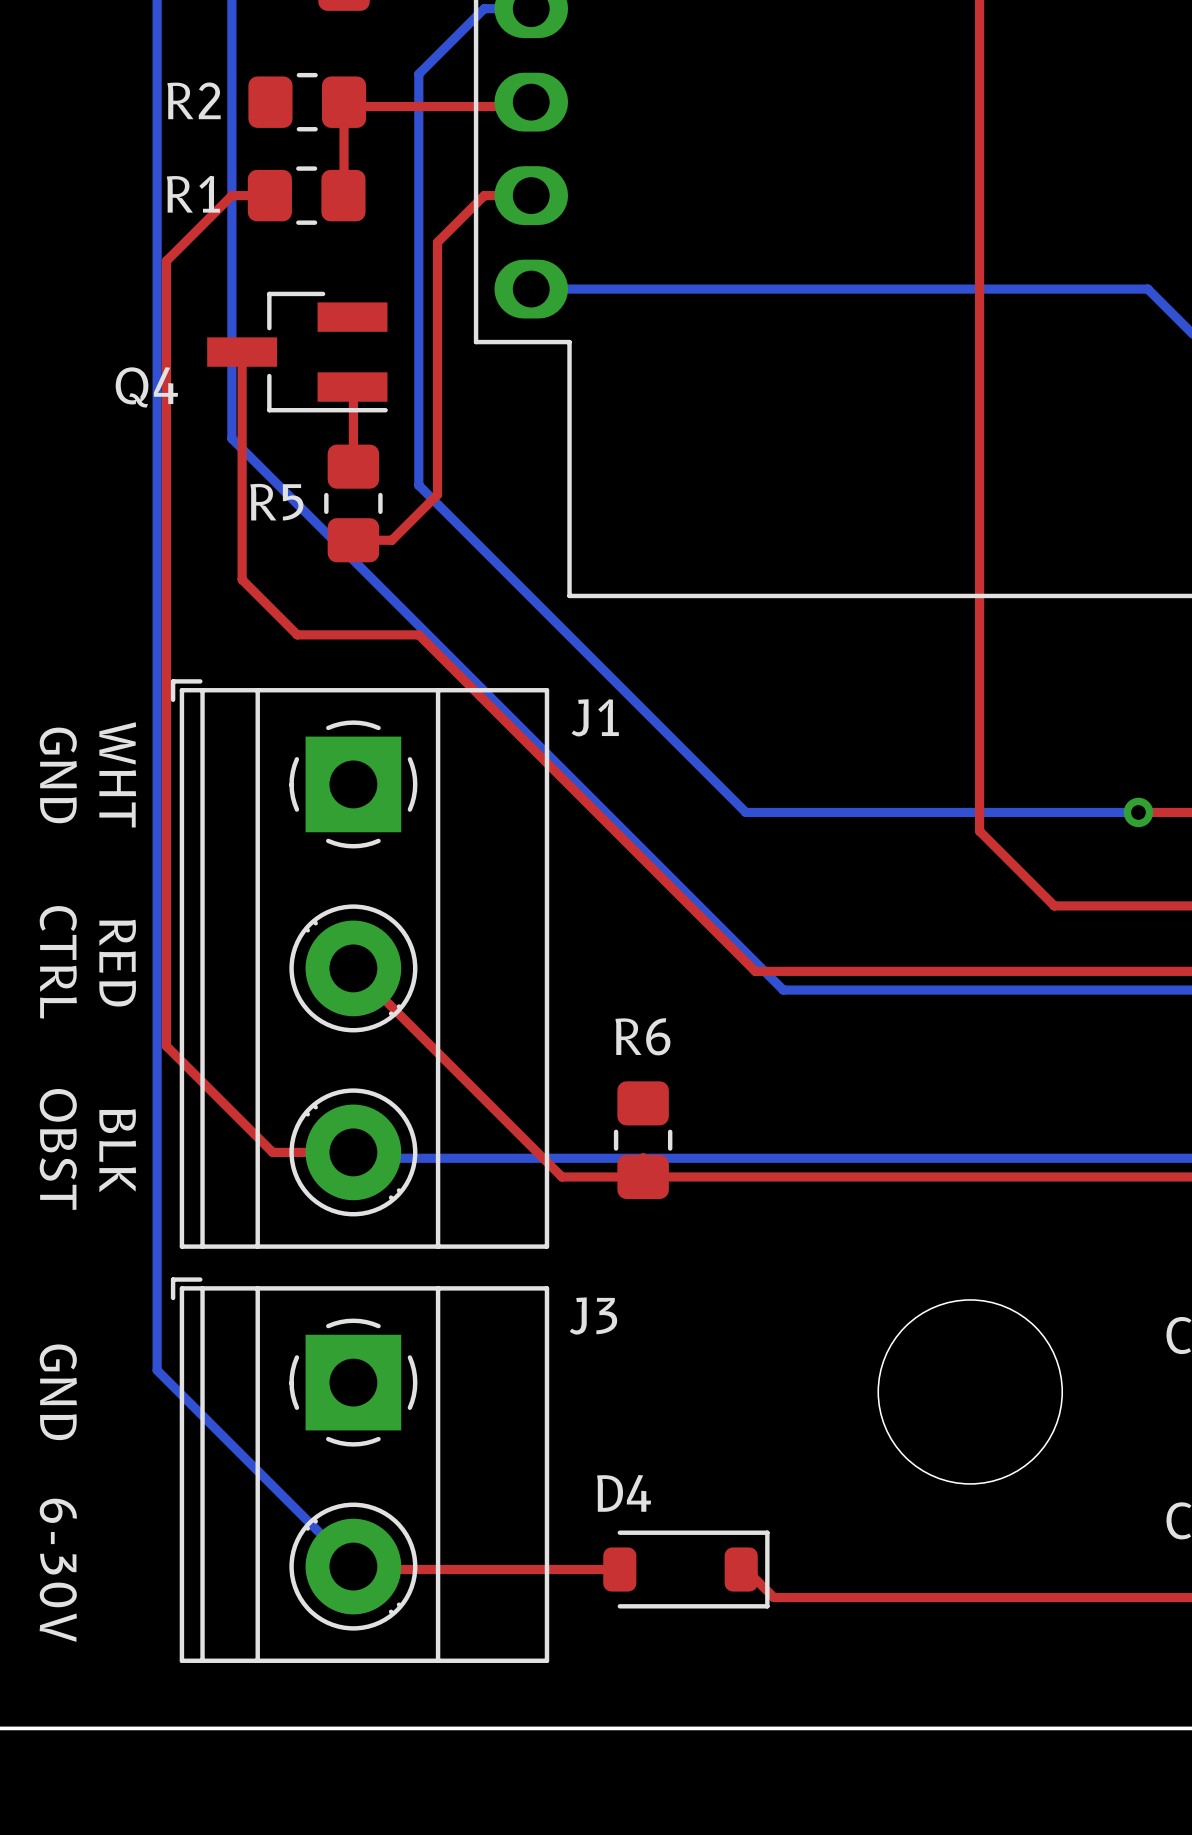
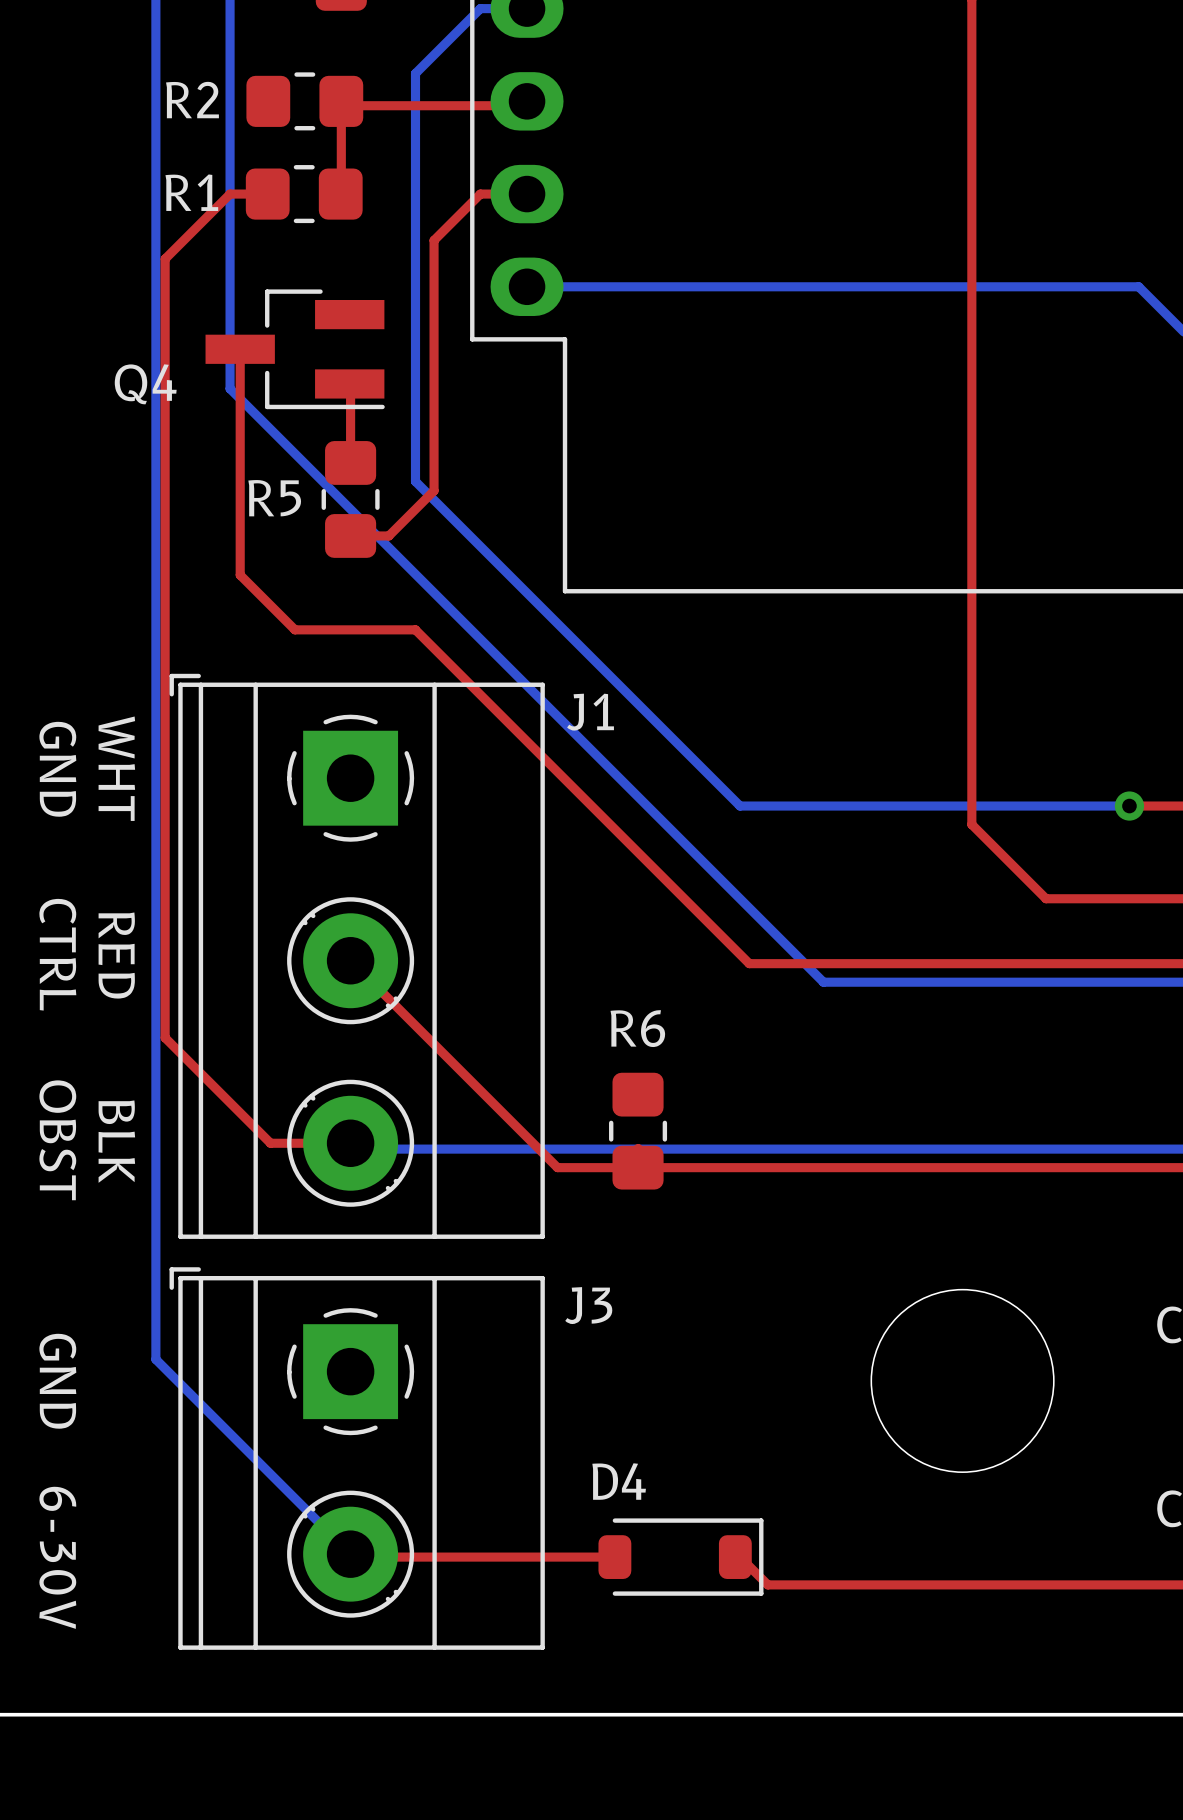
bottom track: (231, 391) (231, 438) (783, 990) (830, 990) -> (230, 388) (823, 982)

